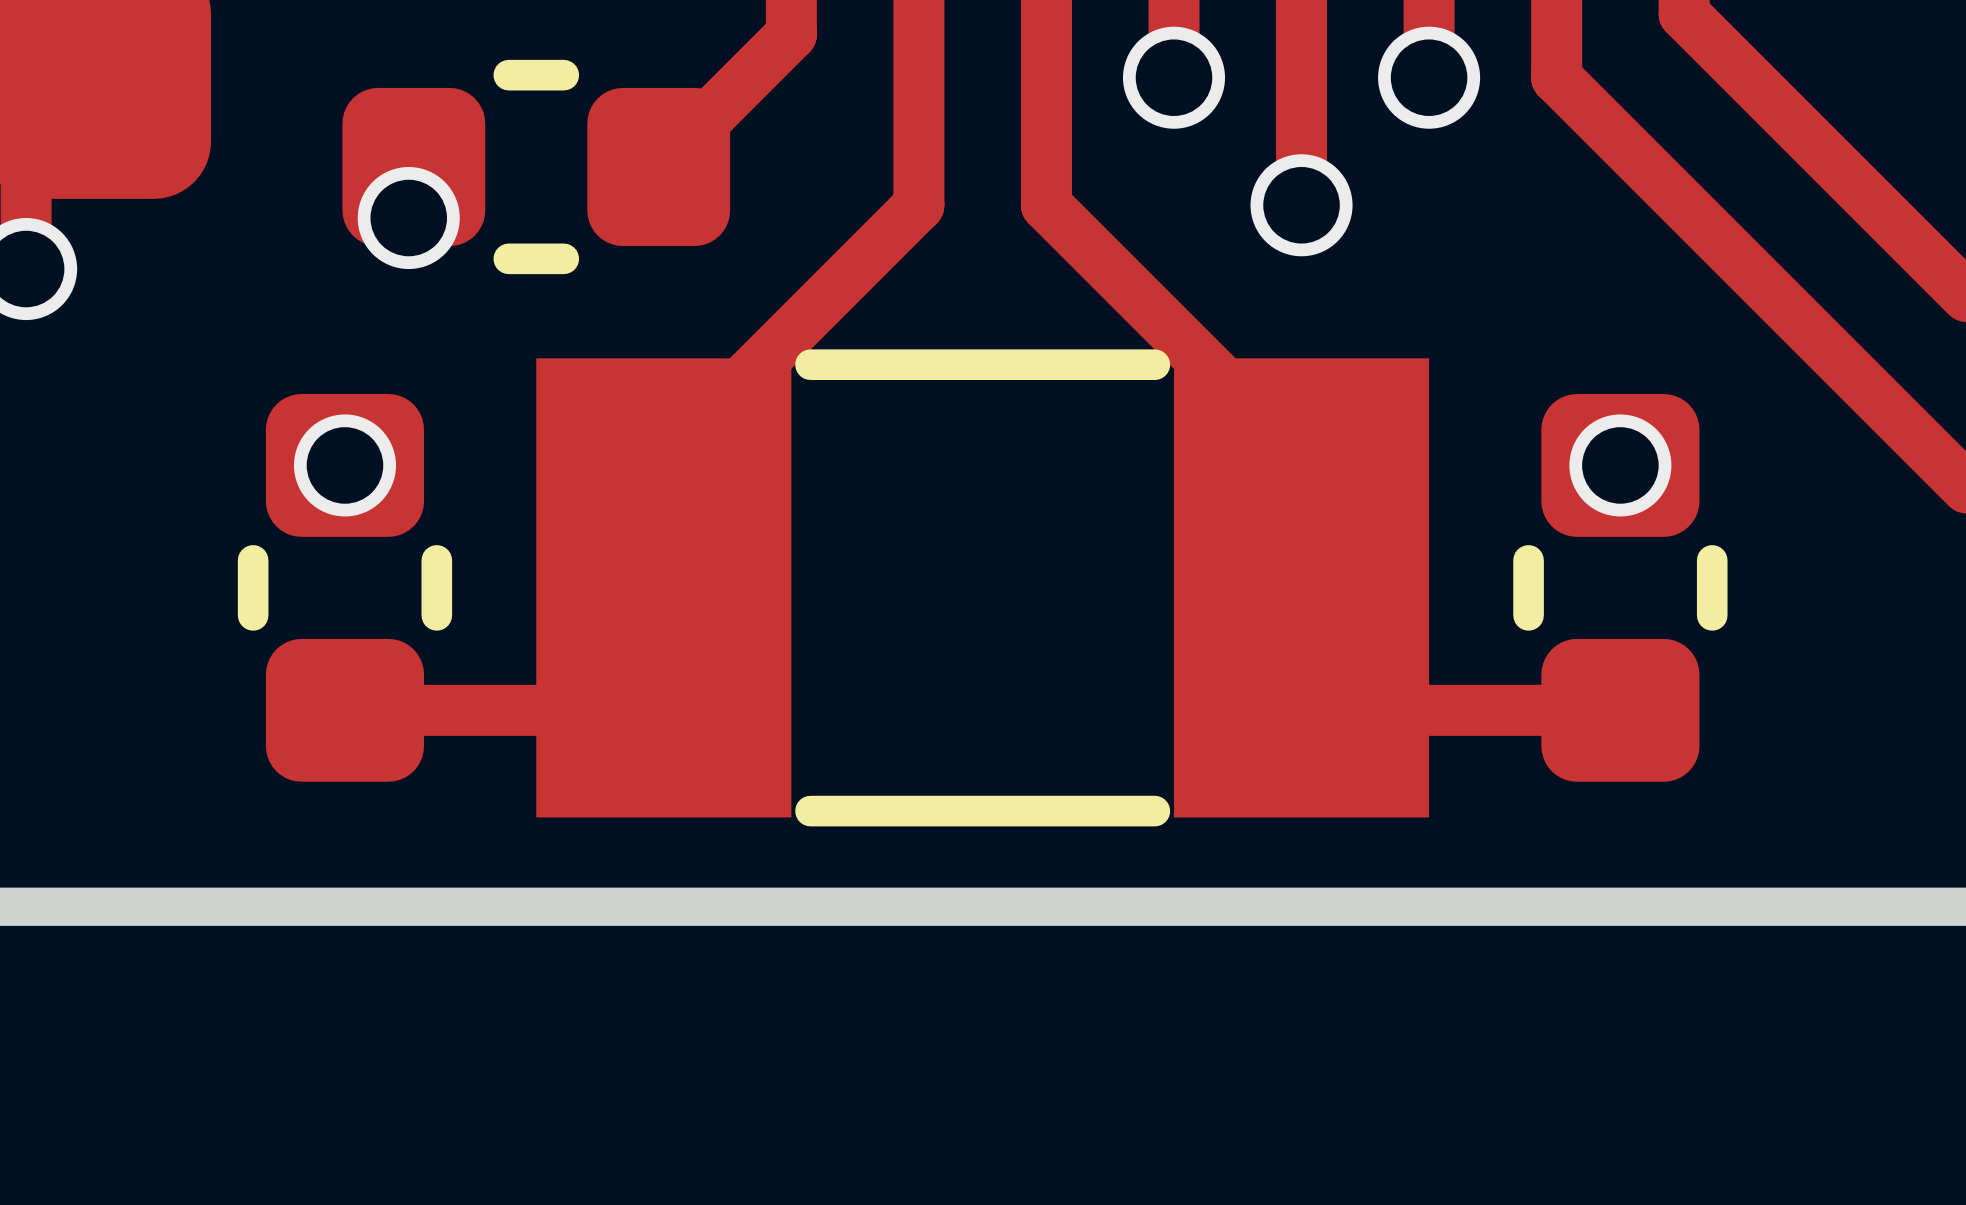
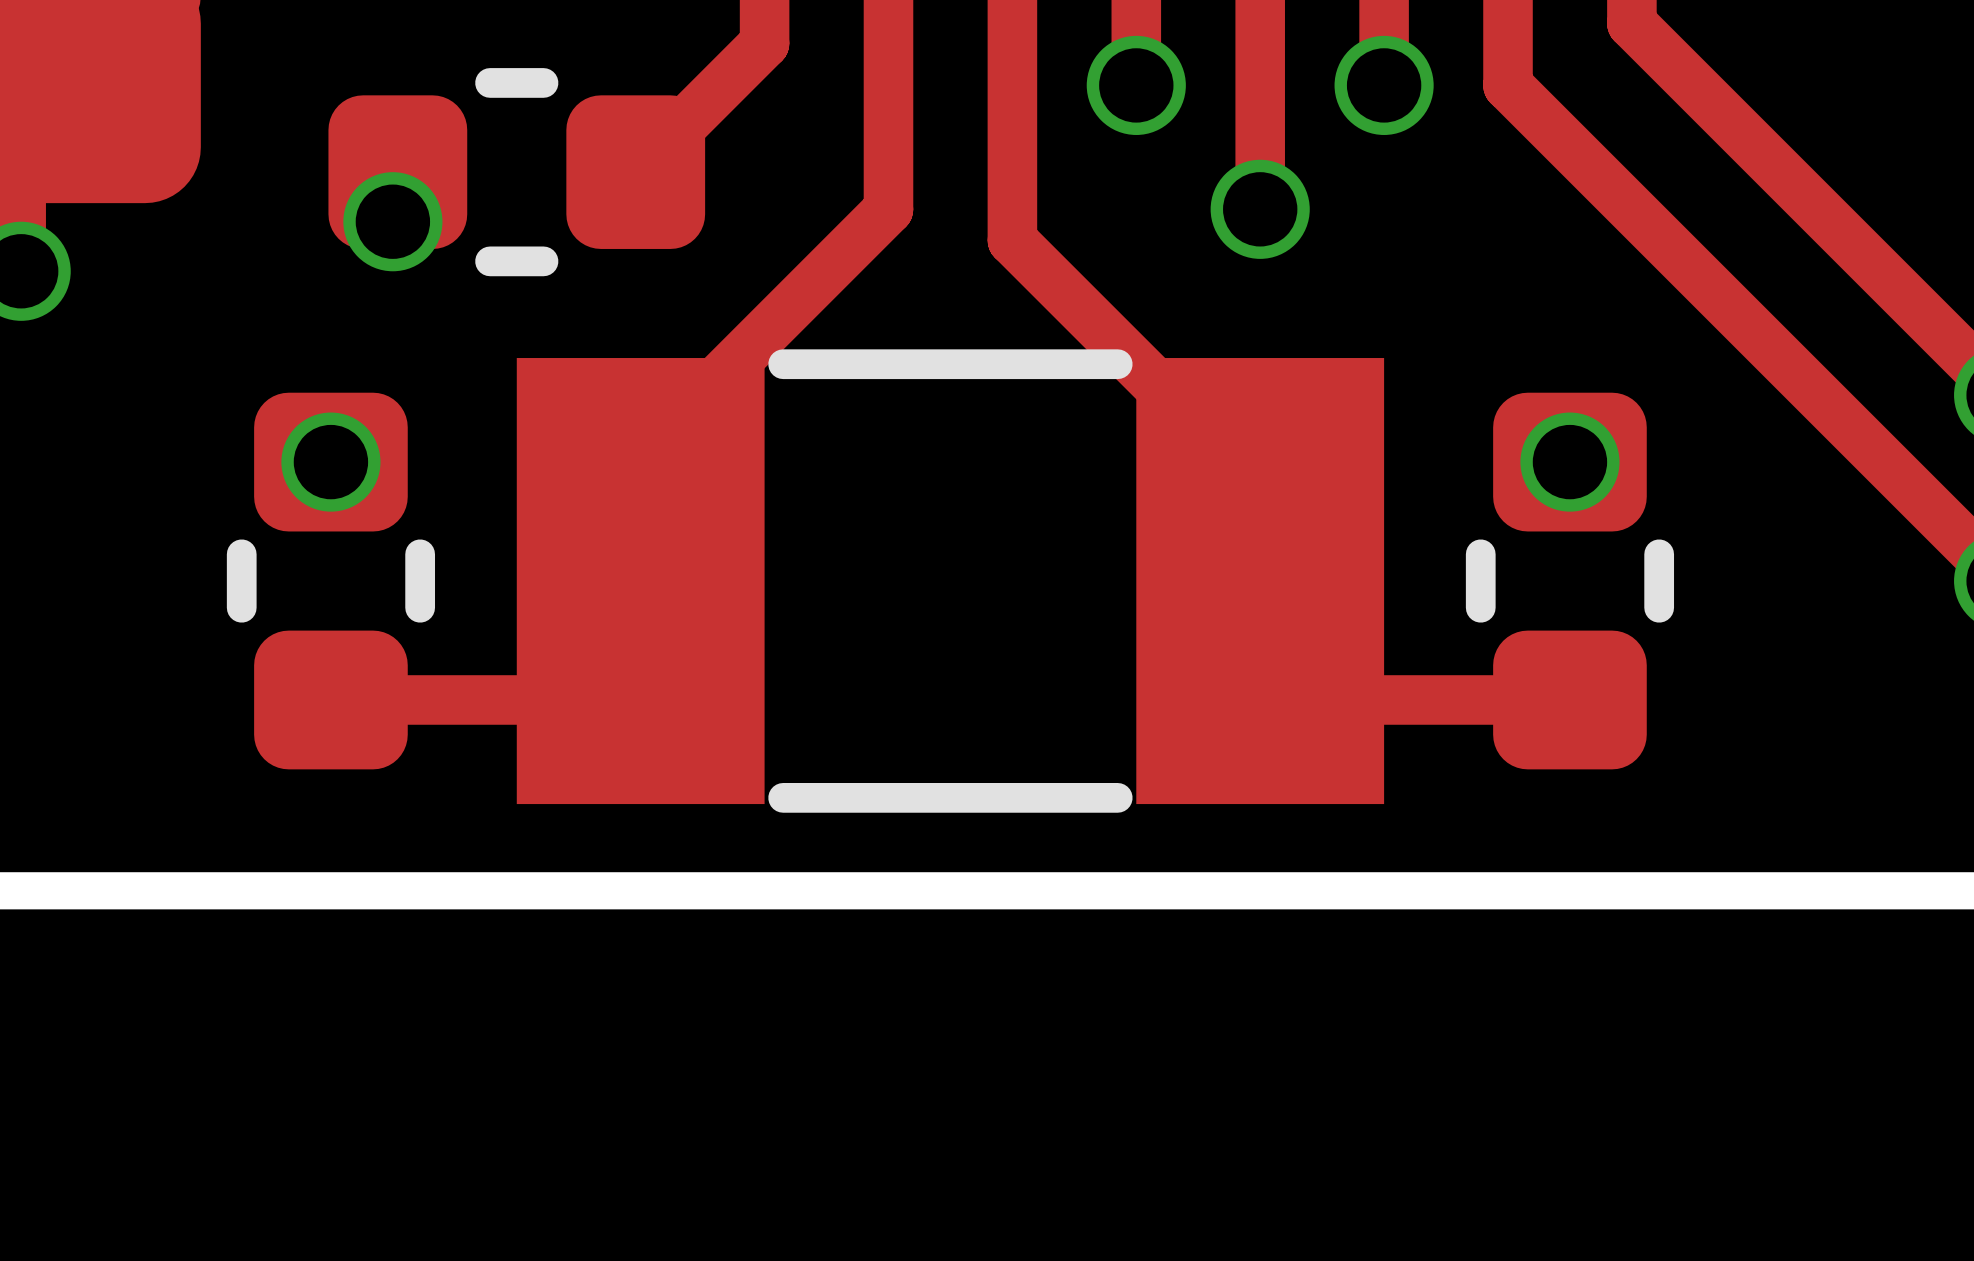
track: (1046, 205) (1301, 460) (1301, 492) -> (1012, 209) (1012, 240) (1260, 488)

